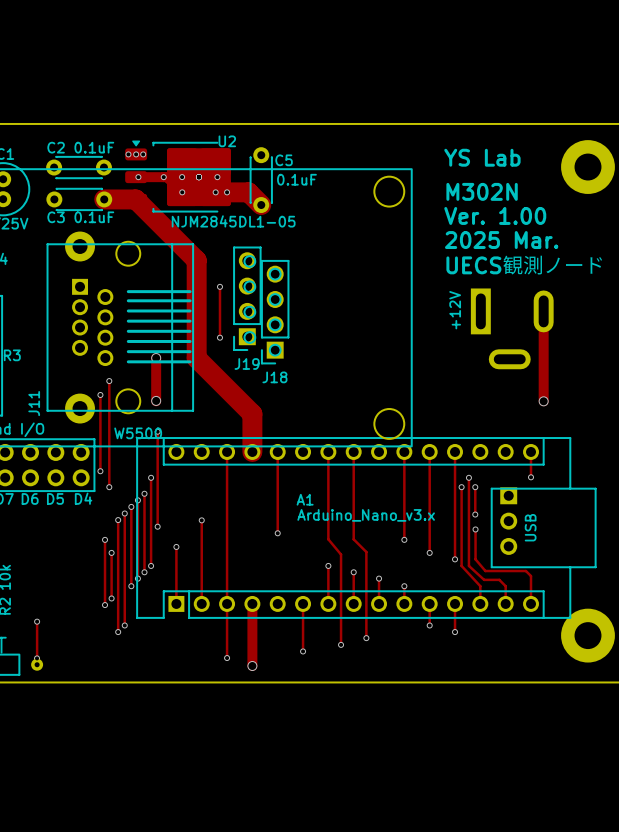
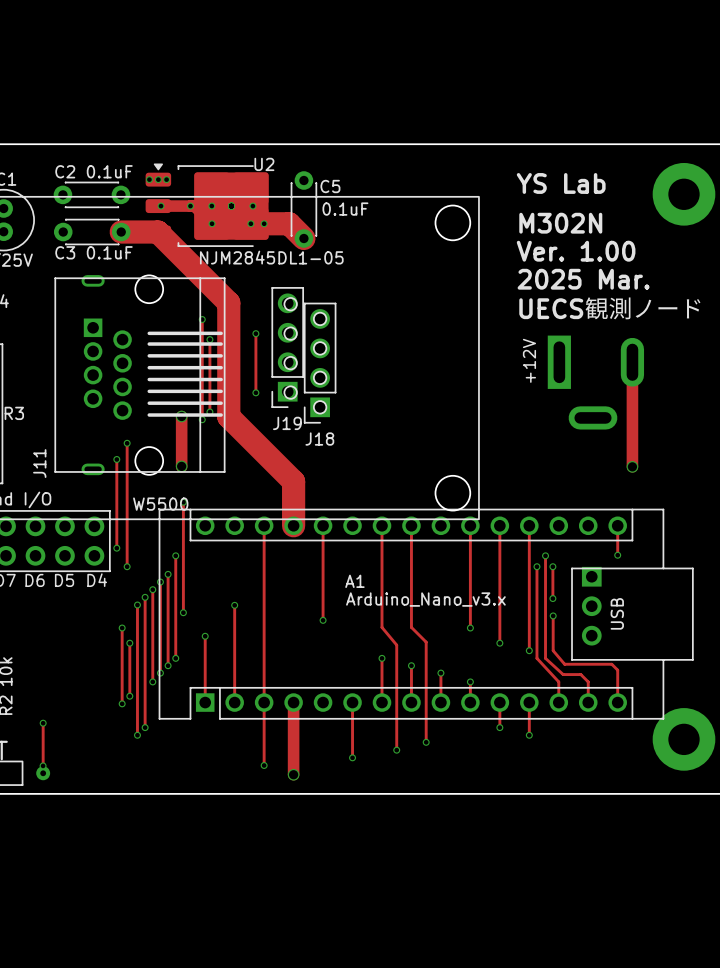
J11 footprint: [46, 231, 194, 424] -> [54, 275, 226, 476]
track: none -> (202, 319) (202, 419)
via: none -> (202, 319)
track: none -> (209, 339) (209, 412)
via: none -> (209, 339)
via: none -> (209, 412)
via: none -> (202, 419)

